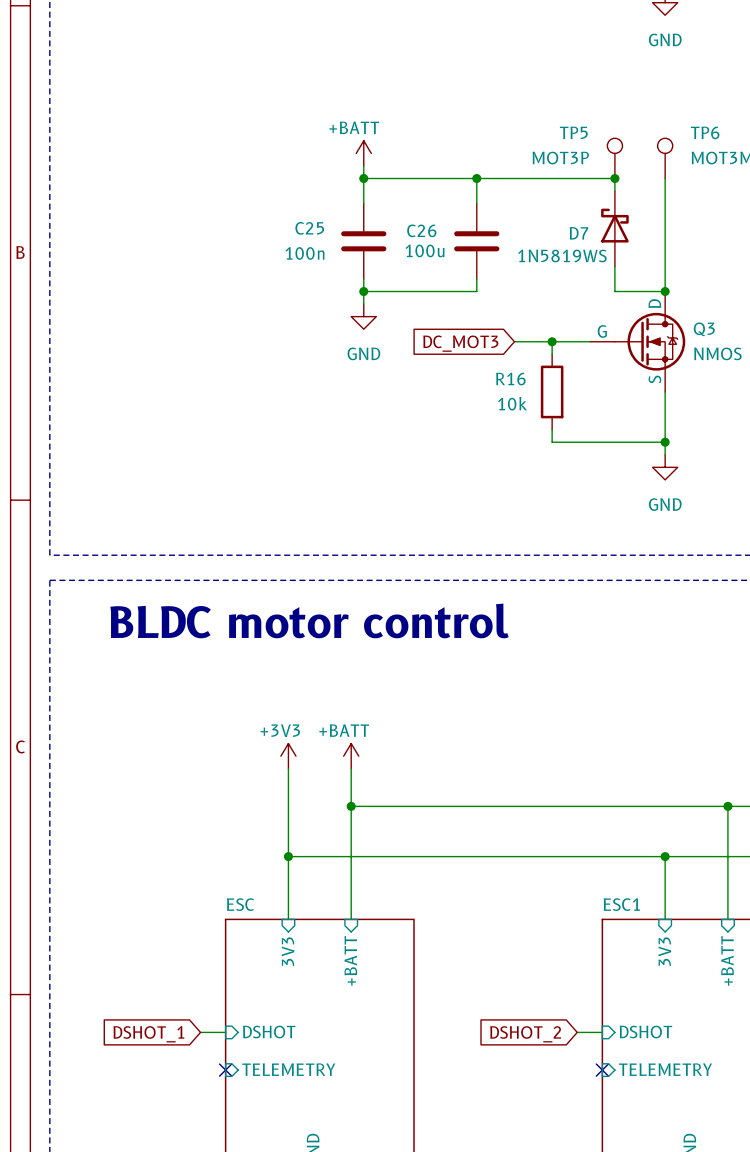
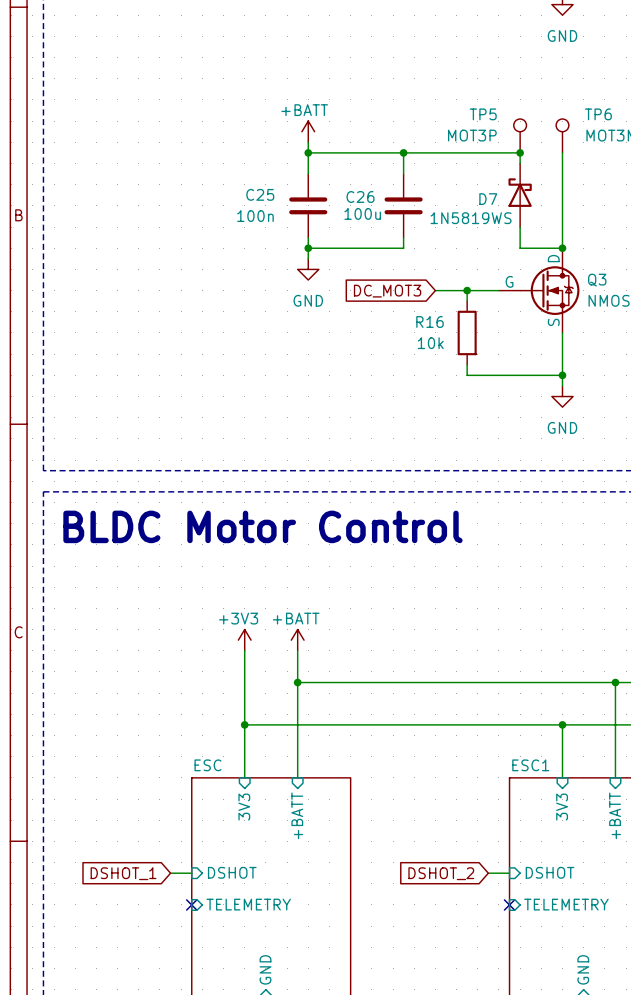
text: BLDC motor control (309, 620) -> BLDC Motor Control (262, 526)

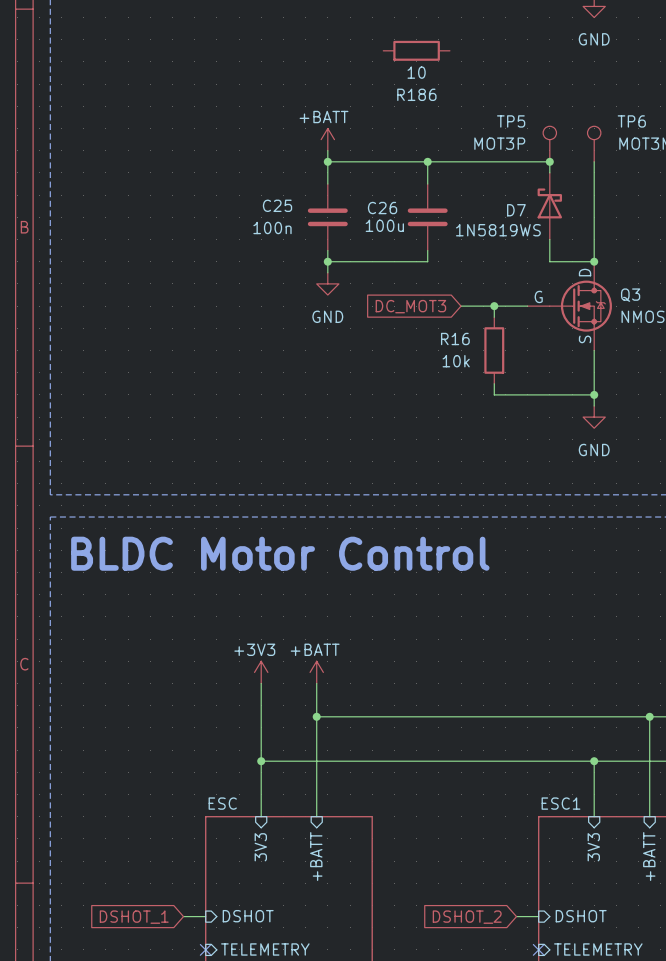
R186: none -> 10 (416, 50)

